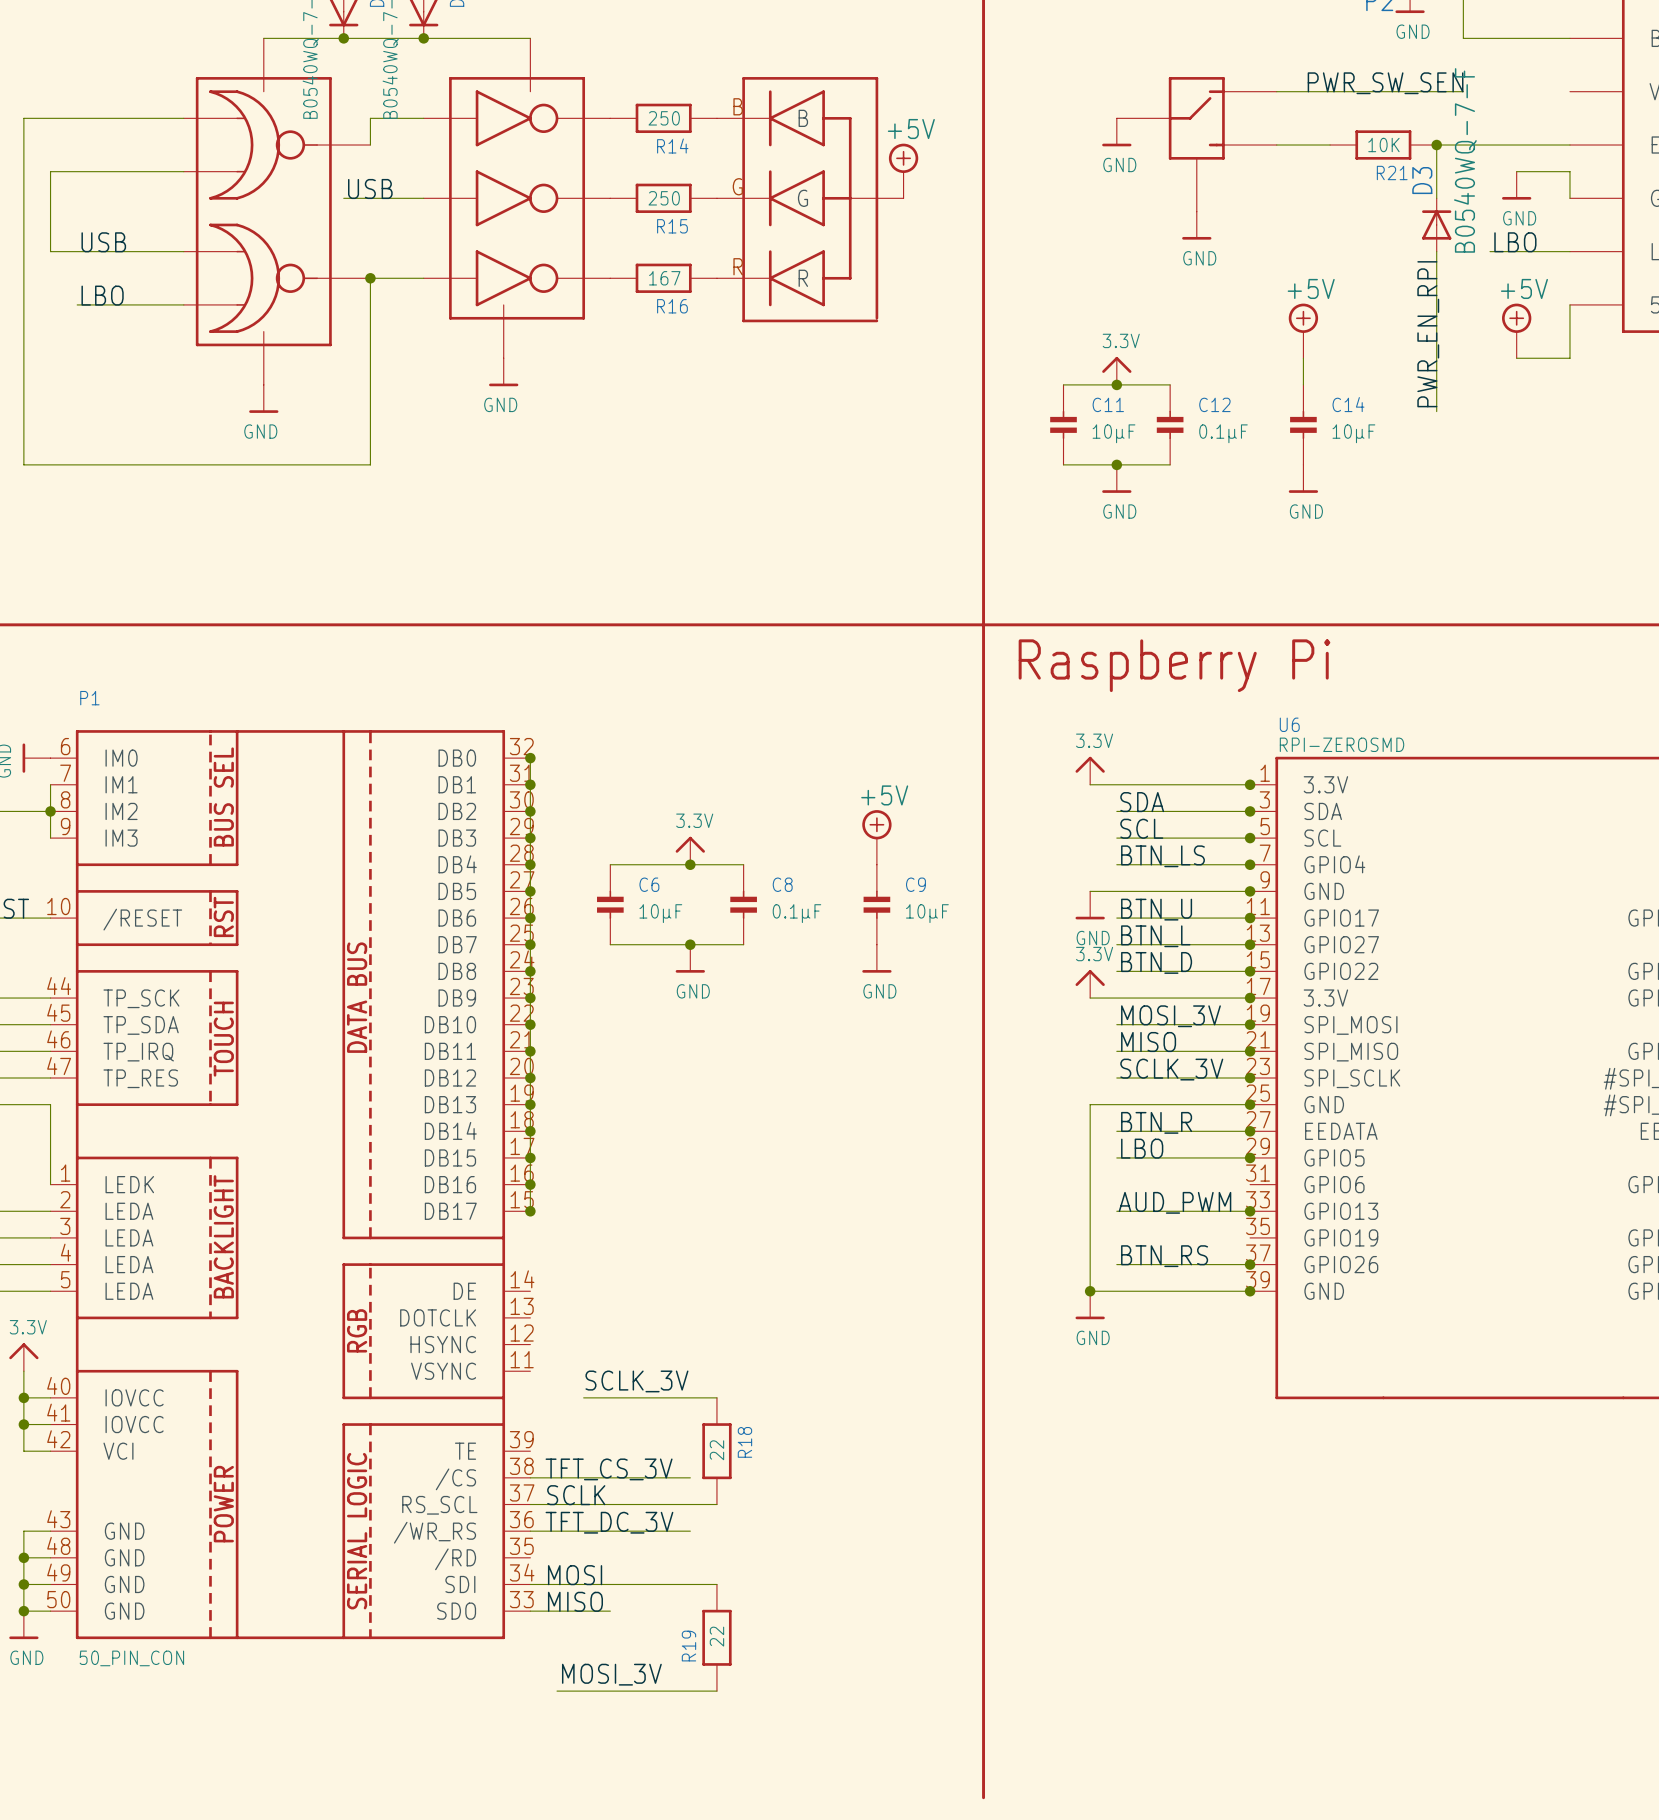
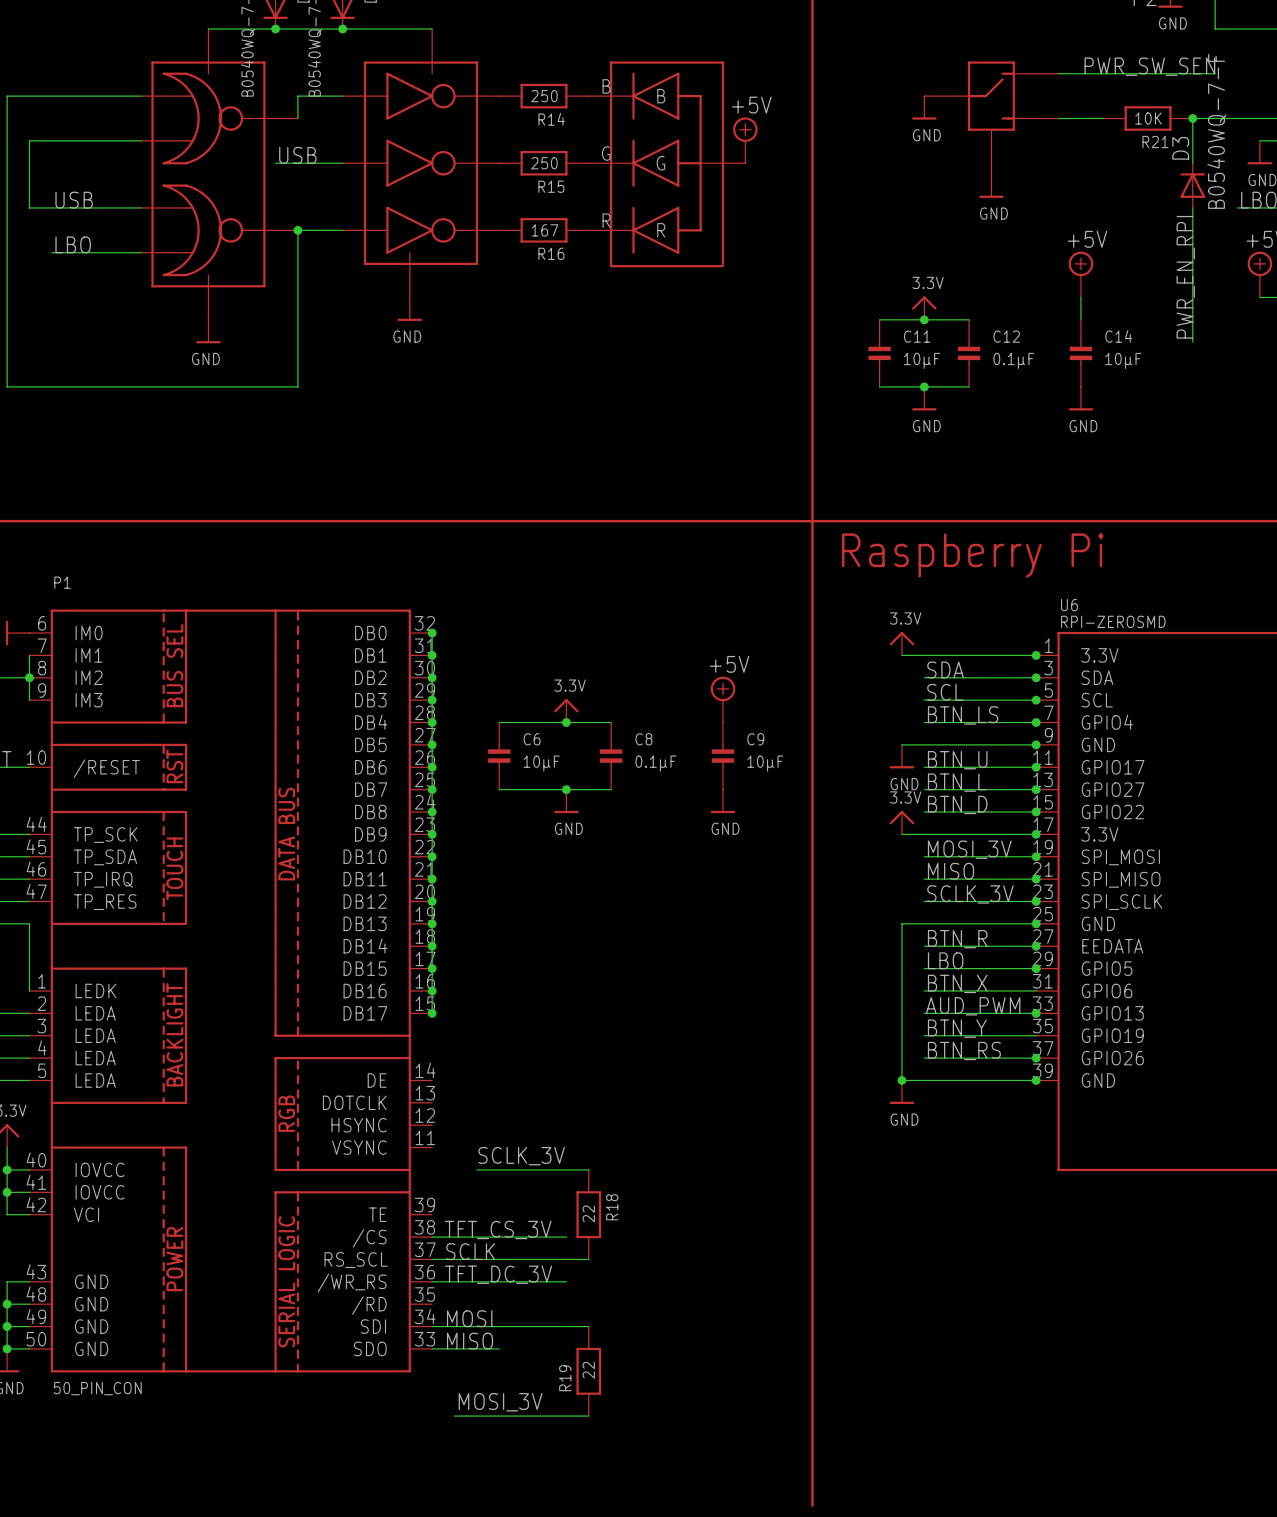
label: none -> BTN_X (957, 983)
wire: none -> (924, 990) (1036, 990)
label: none -> BTN_Y (957, 1028)
wire: none -> (924, 1035) (1036, 1035)

